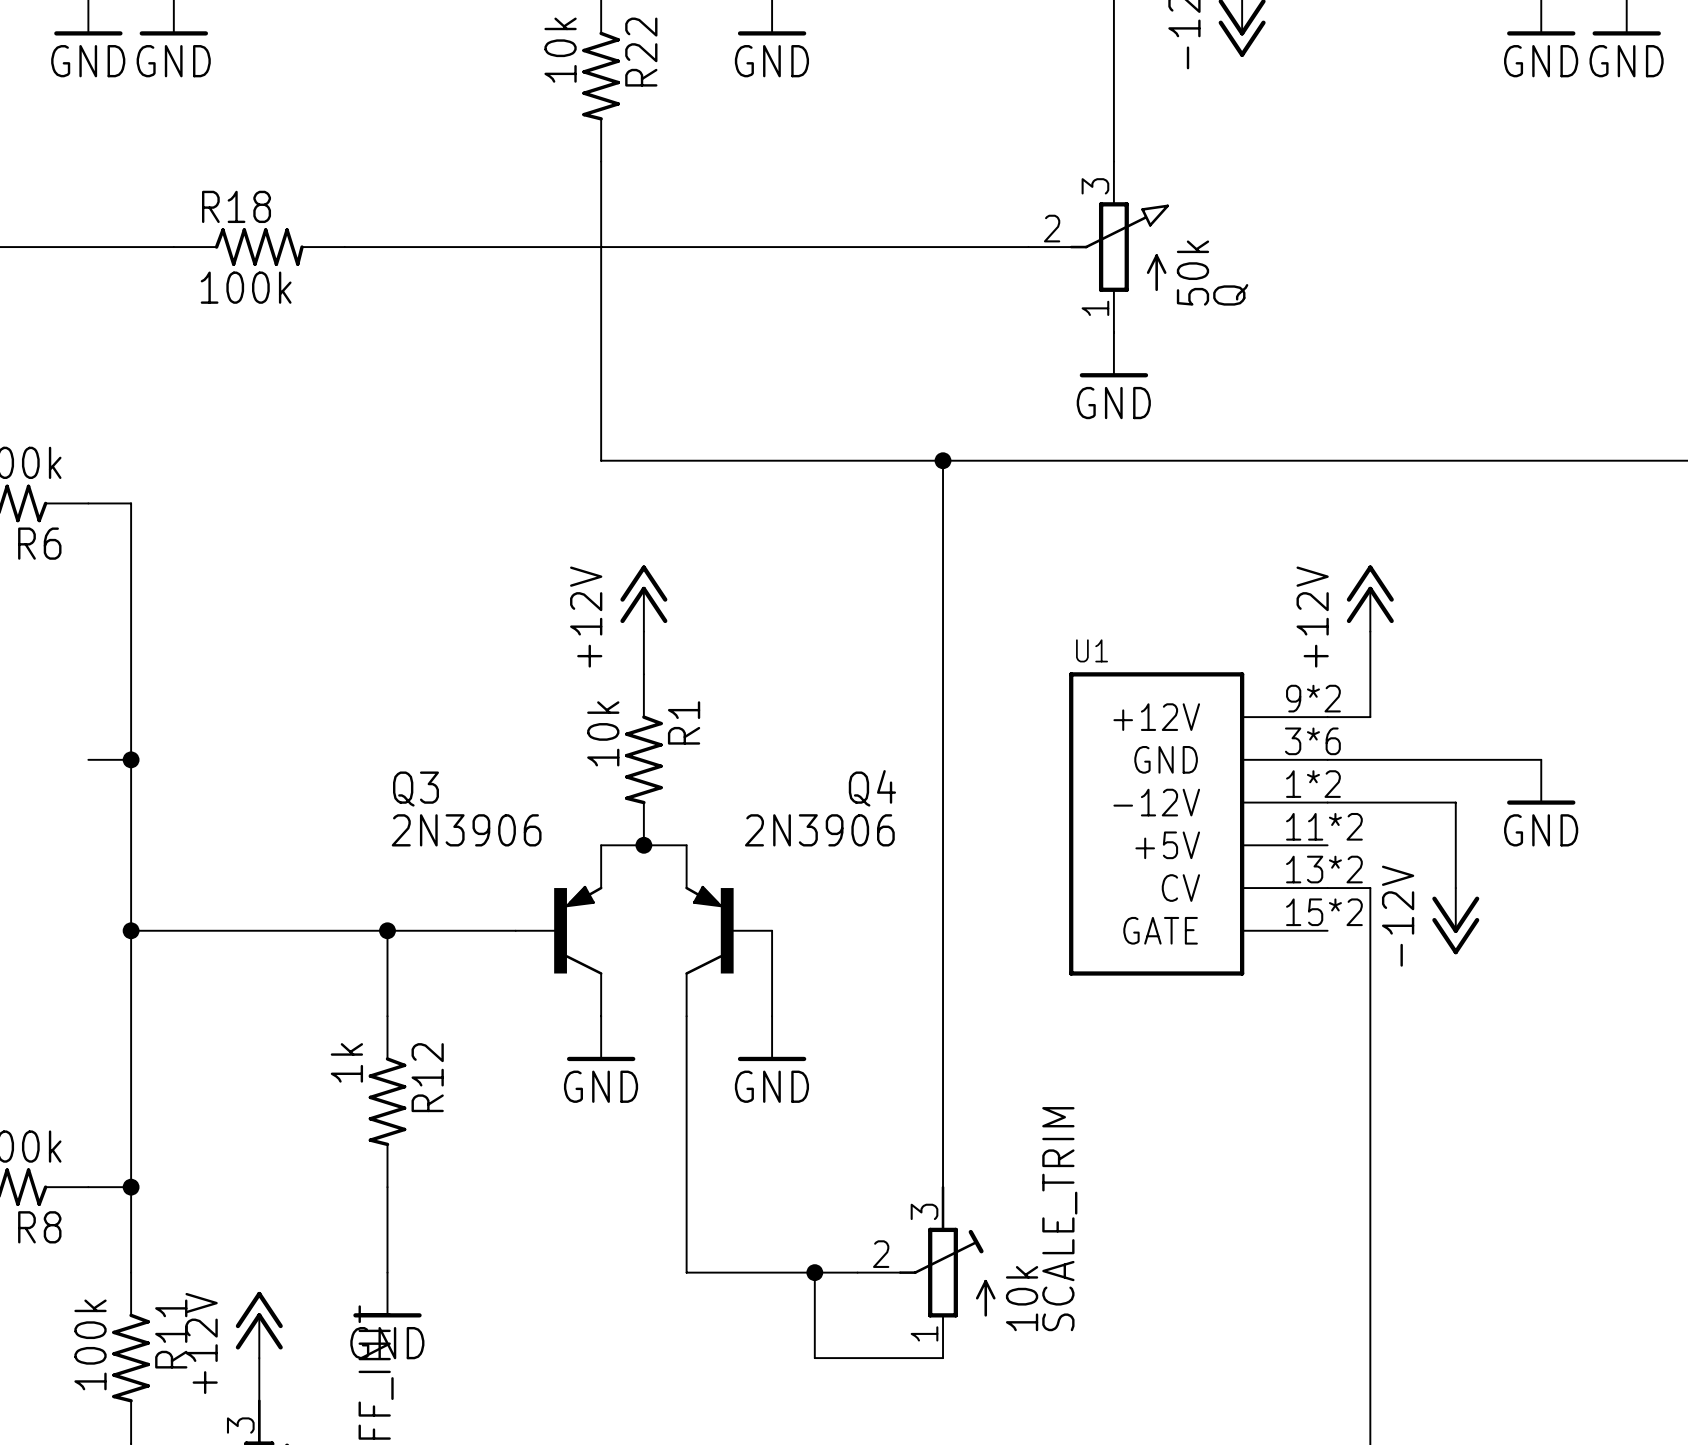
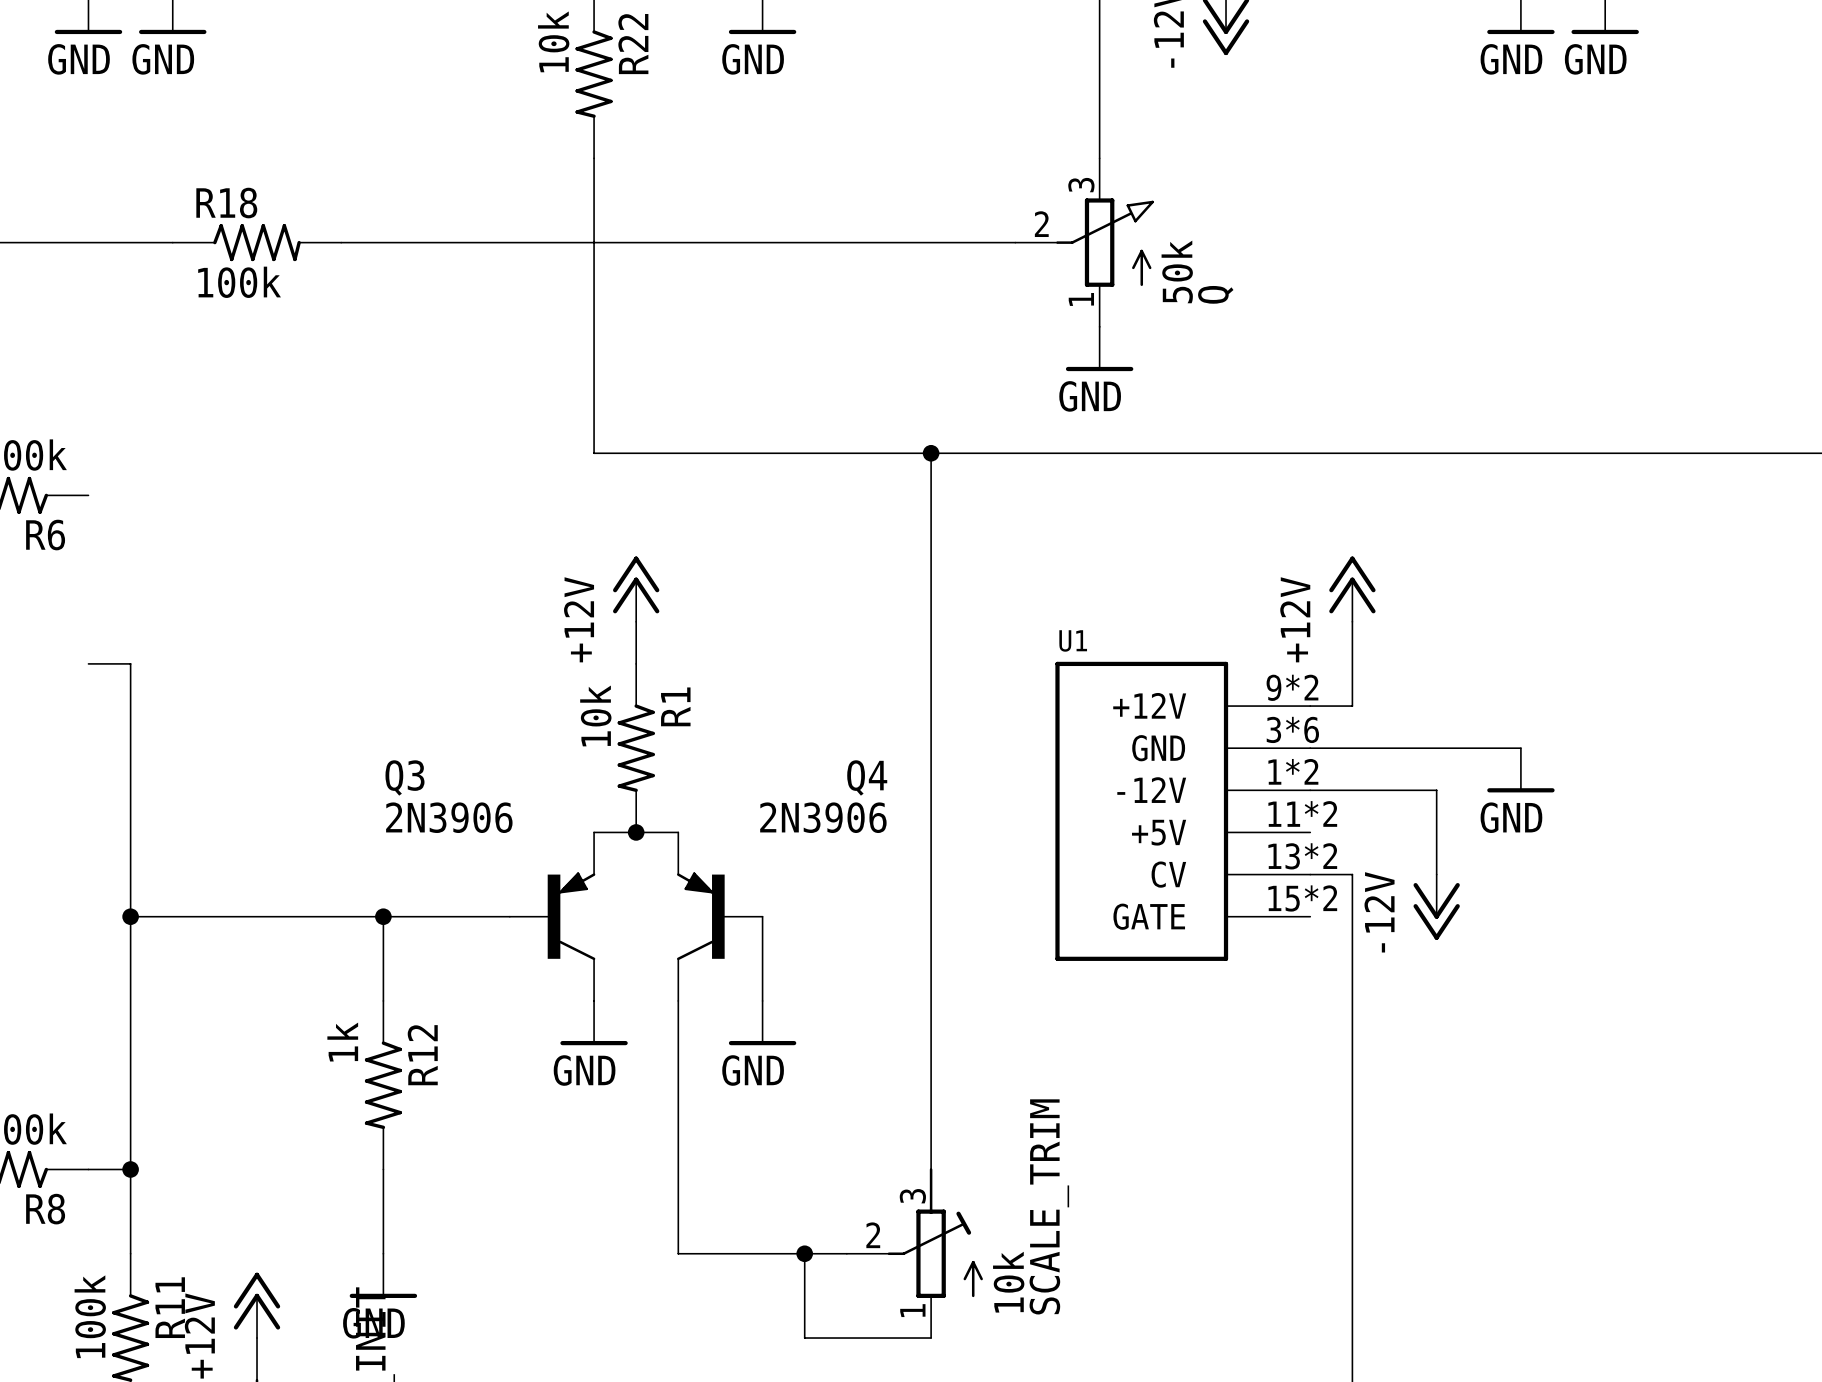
wire: (88, 503) (131, 503) (131, 674) -> (88, 663) (130, 663)
wire: (88, 759) (131, 759) -> none
junction: (131, 759) -> none

